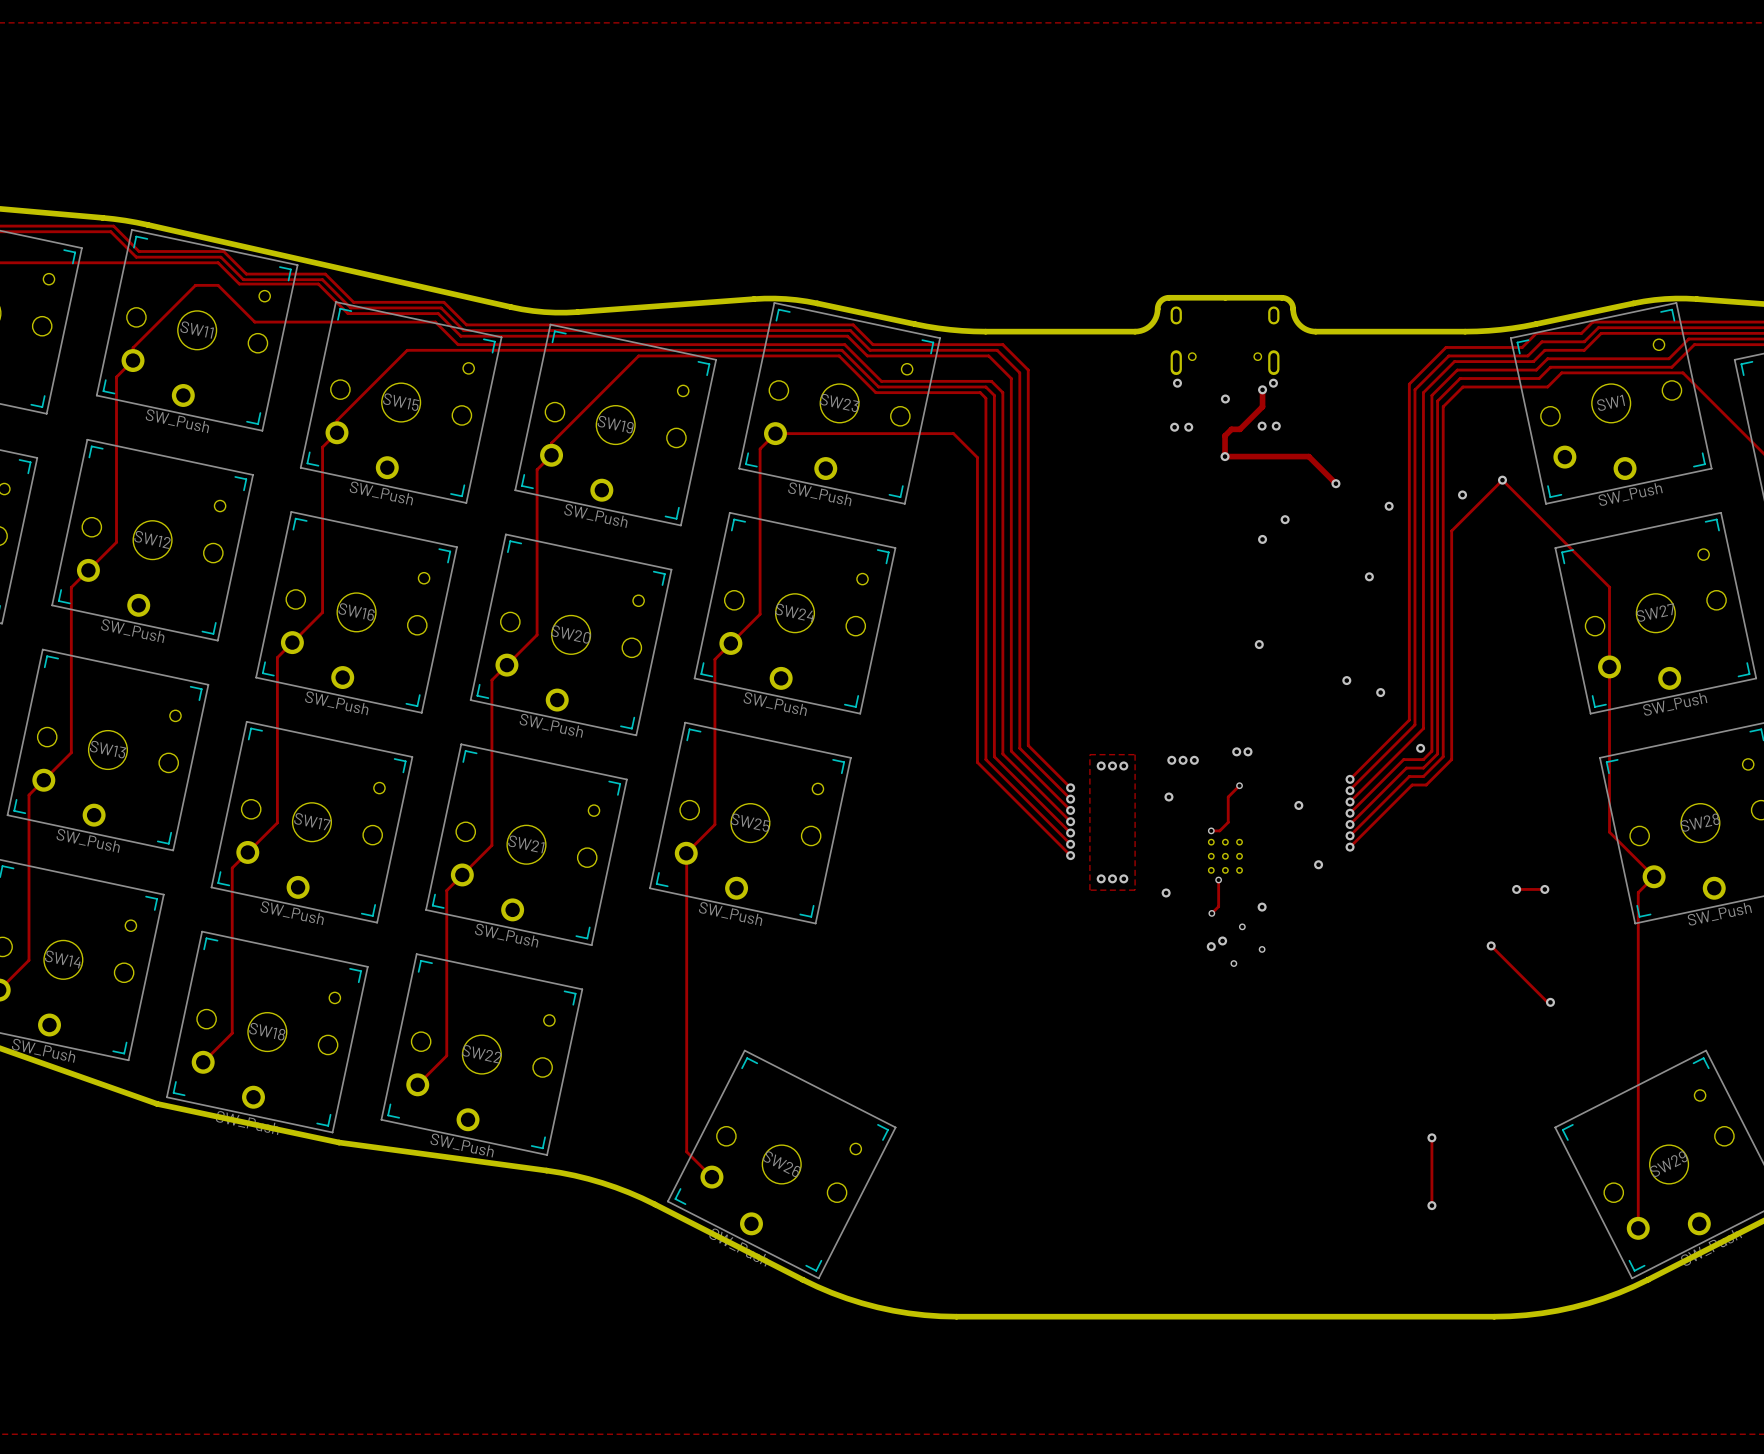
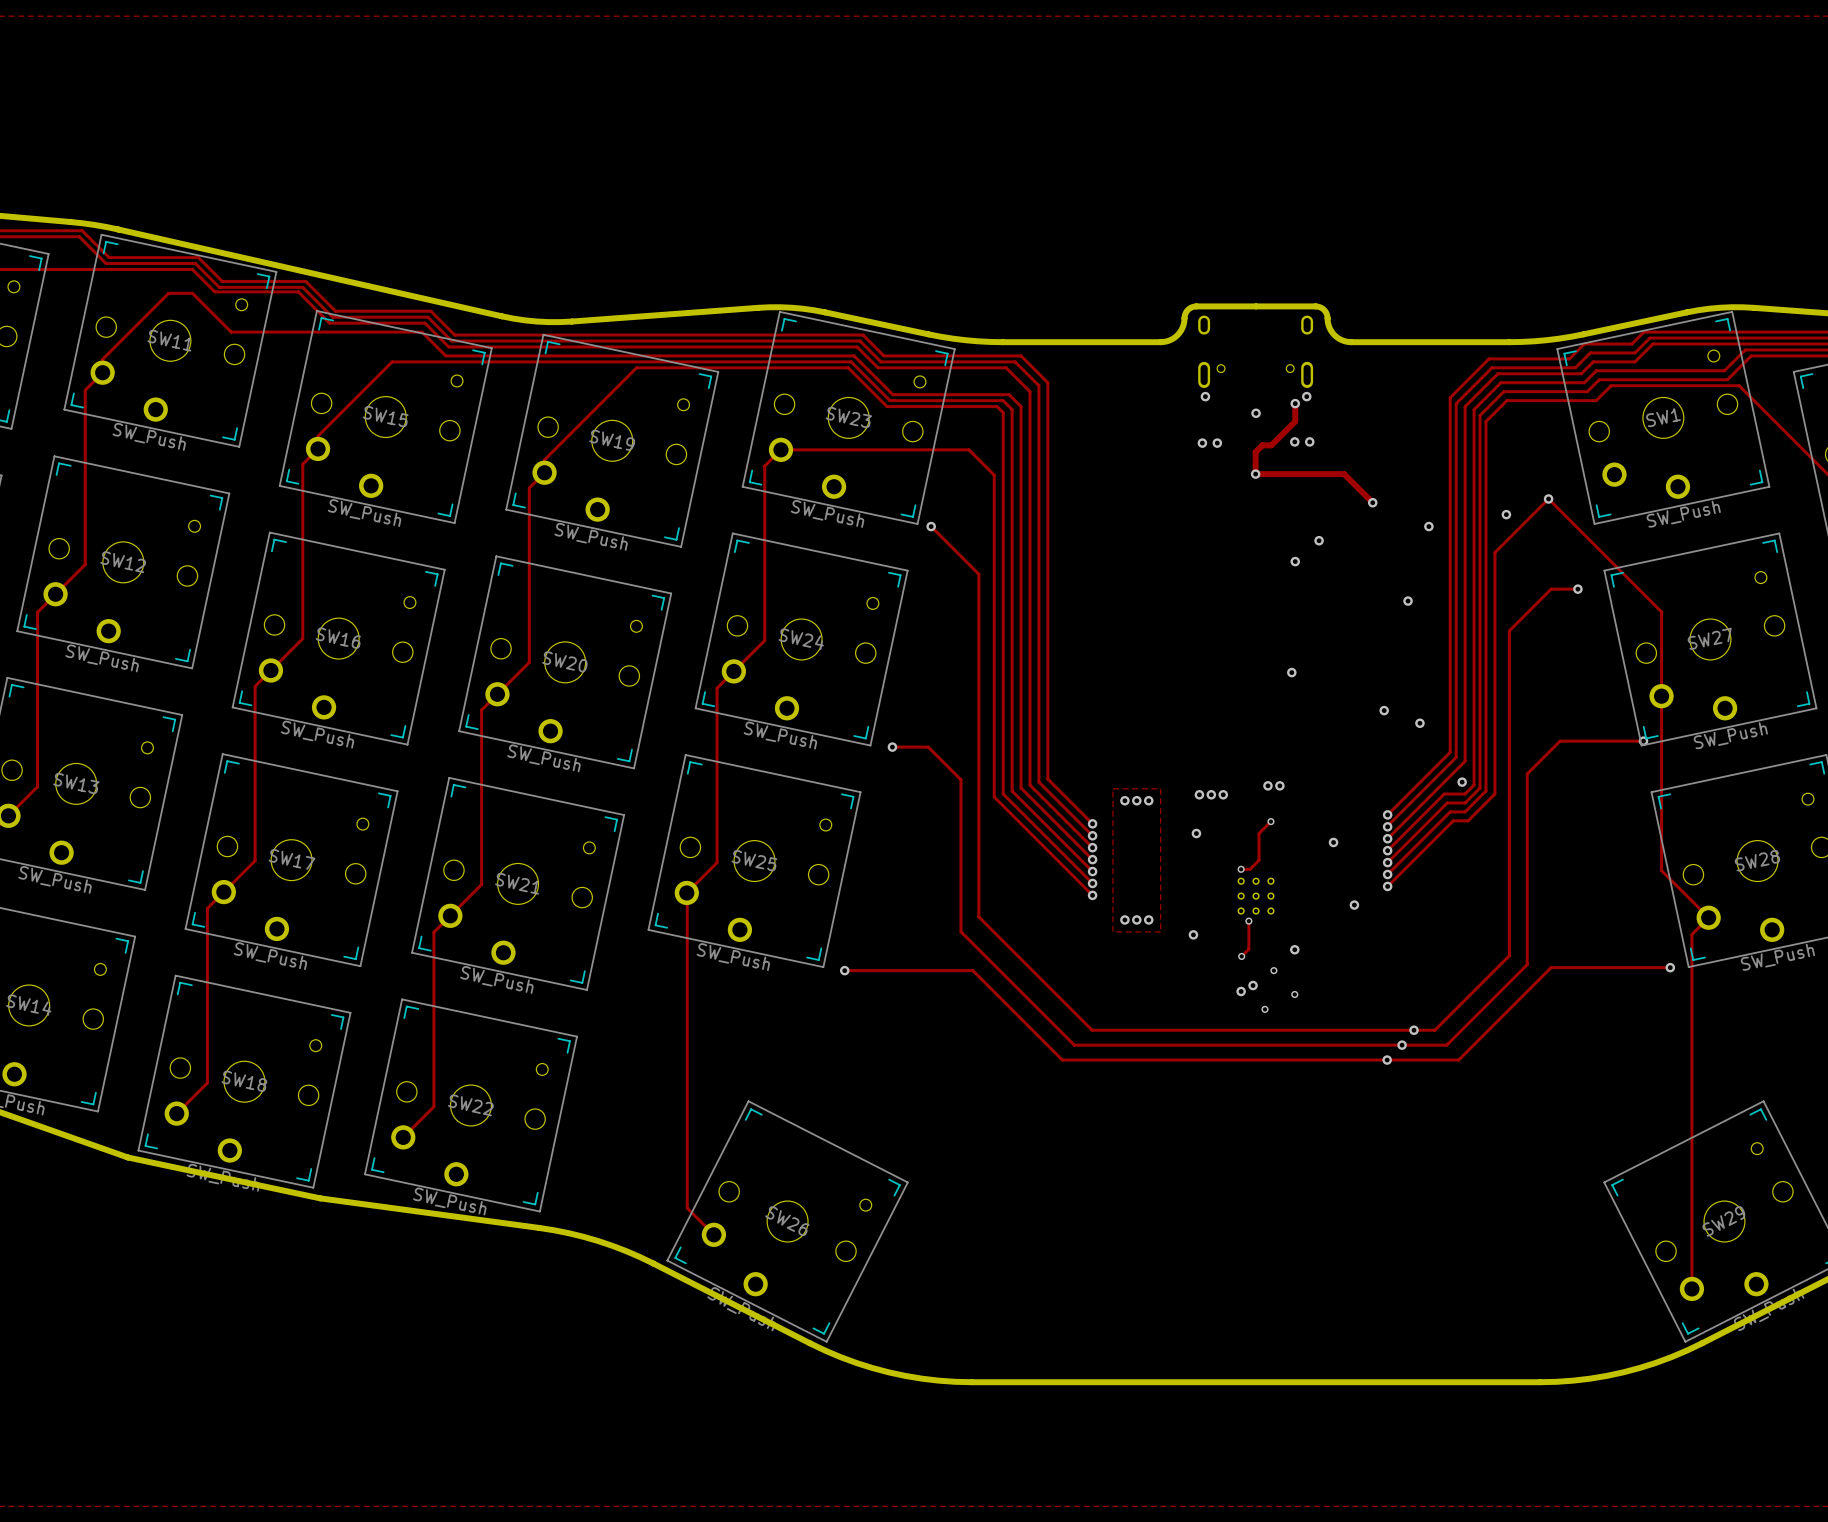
track: none -> (931, 526) (978, 574) (978, 916) (1092, 1030) (1434, 1030) (1509, 955) (1509, 630) (1551, 589) (1577, 589)
via: none -> (931, 526)
via: none -> (1577, 589)
track: none -> (1643, 741) (1560, 741) (1527, 773) (1527, 964) (1446, 1045) (1074, 1045) (960, 931) (960, 779) (928, 747) (892, 747)
via: none -> (1643, 741)
via: none -> (892, 747)
track: (1516, 889) (1544, 889) -> none
via: (1516, 889) -> none
via: (1544, 889) -> none
track: none -> (1670, 967) (1551, 967) (1458, 1060) (1062, 1060) (972, 970) (844, 970)
via: none -> (1670, 967)
via: none -> (844, 970)
track: (1491, 945) (1547, 1002) (1550, 1002) -> none
via: (1491, 945) -> none
via: none -> (1414, 1030)
via: none -> (1402, 1045)
via: (1550, 1002) -> none
via: none -> (1387, 1060)
track: (1431, 1137) (1431, 1205) -> none
via: (1431, 1137) -> none
via: (1431, 1205) -> none

